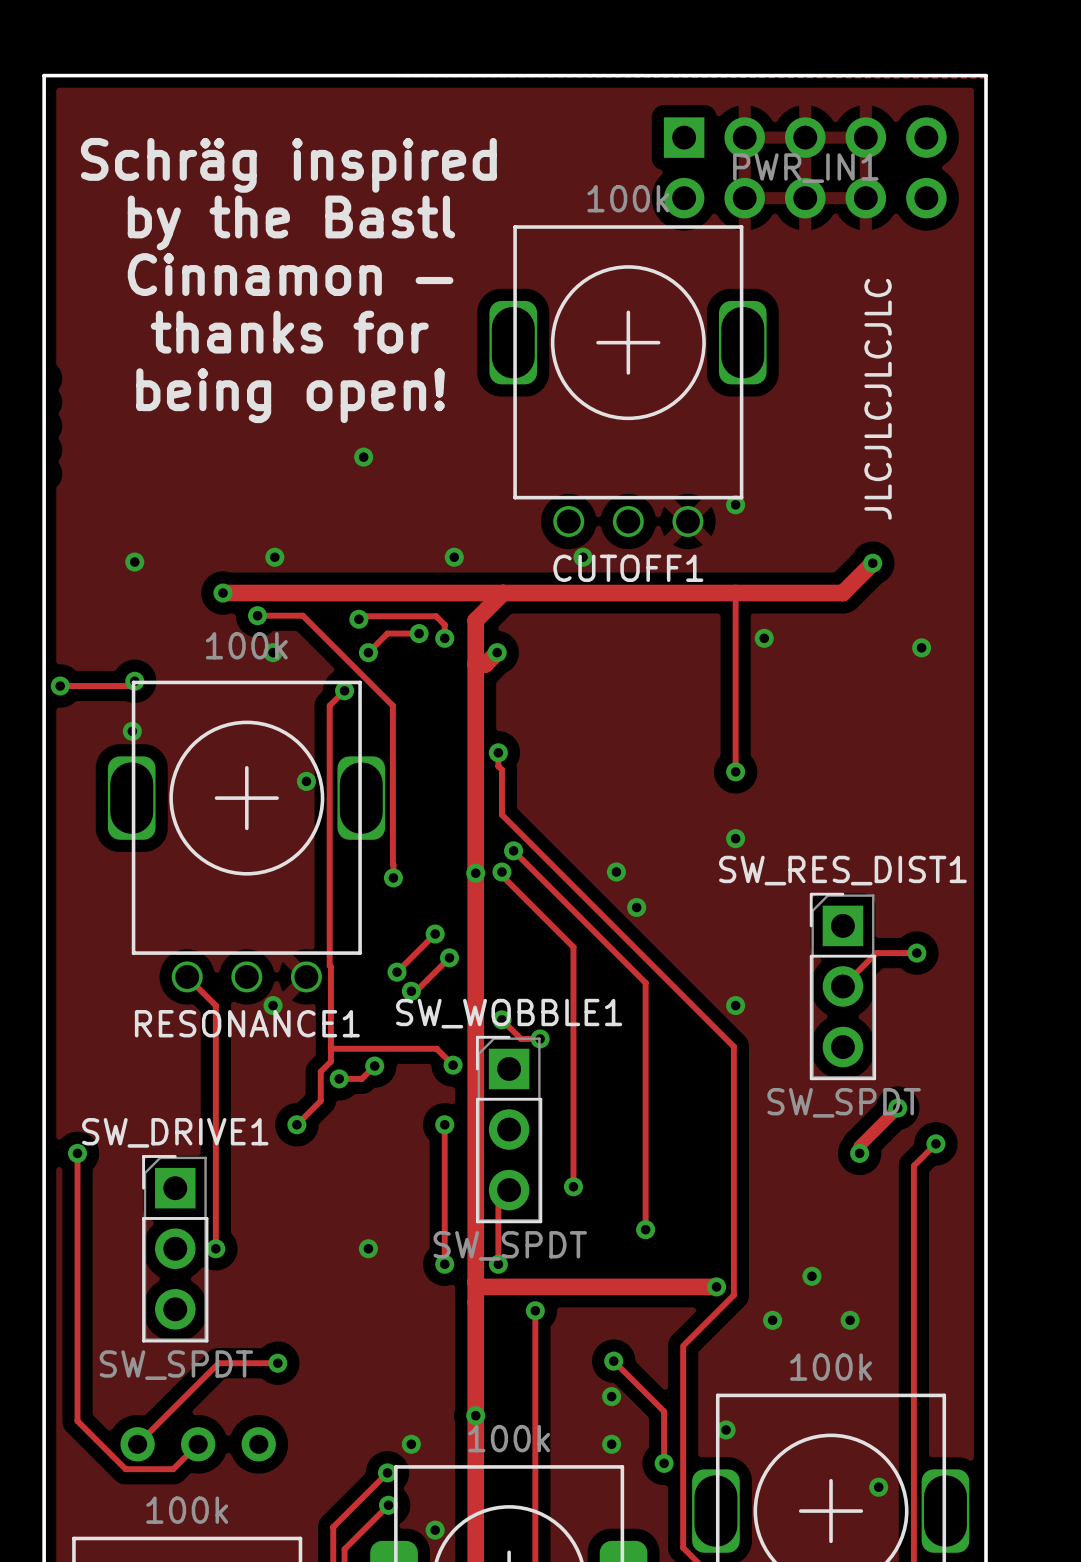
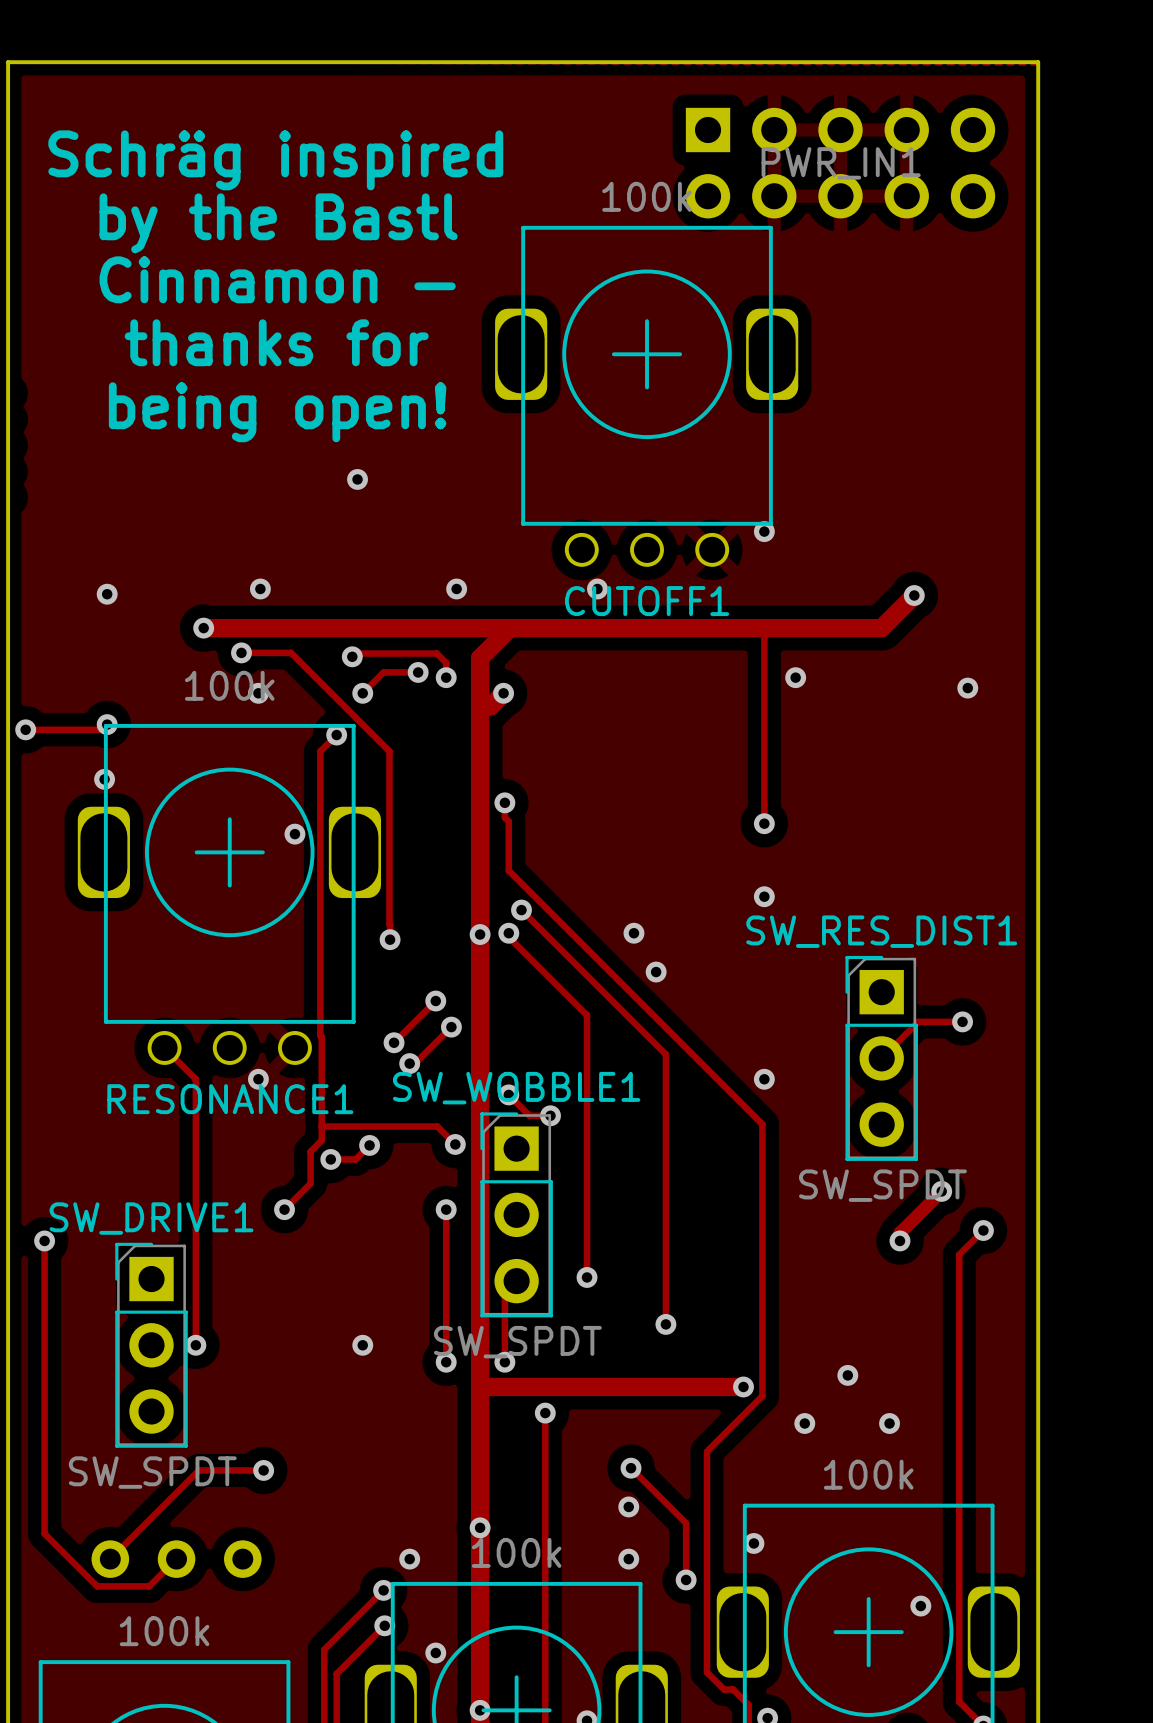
text: JLCJLCJLCJLC (878, 399) -> none

